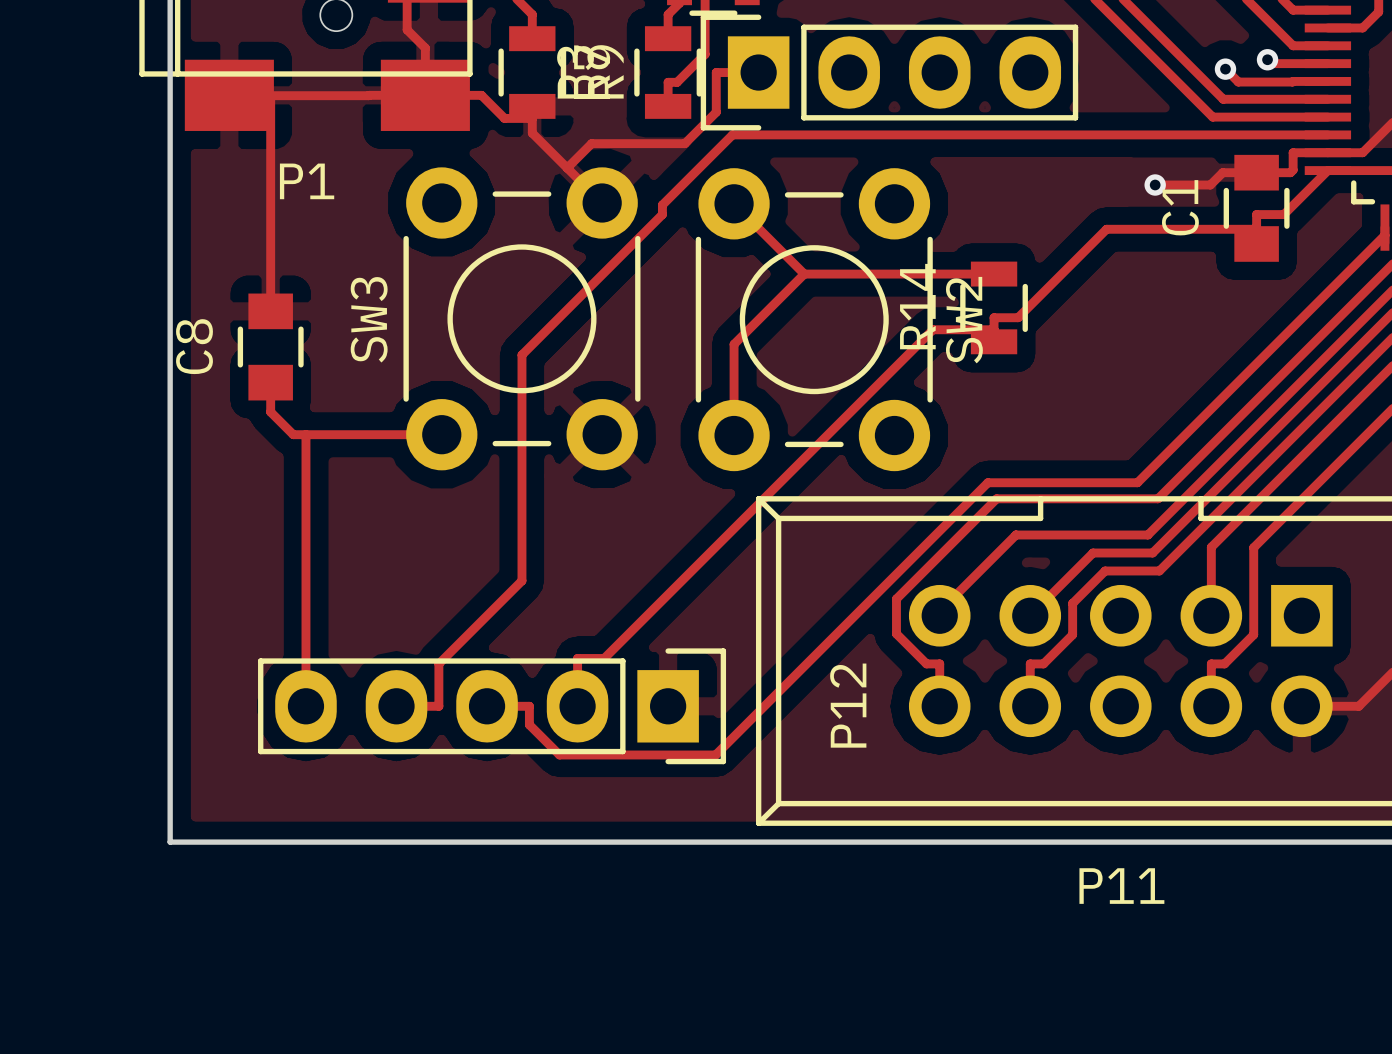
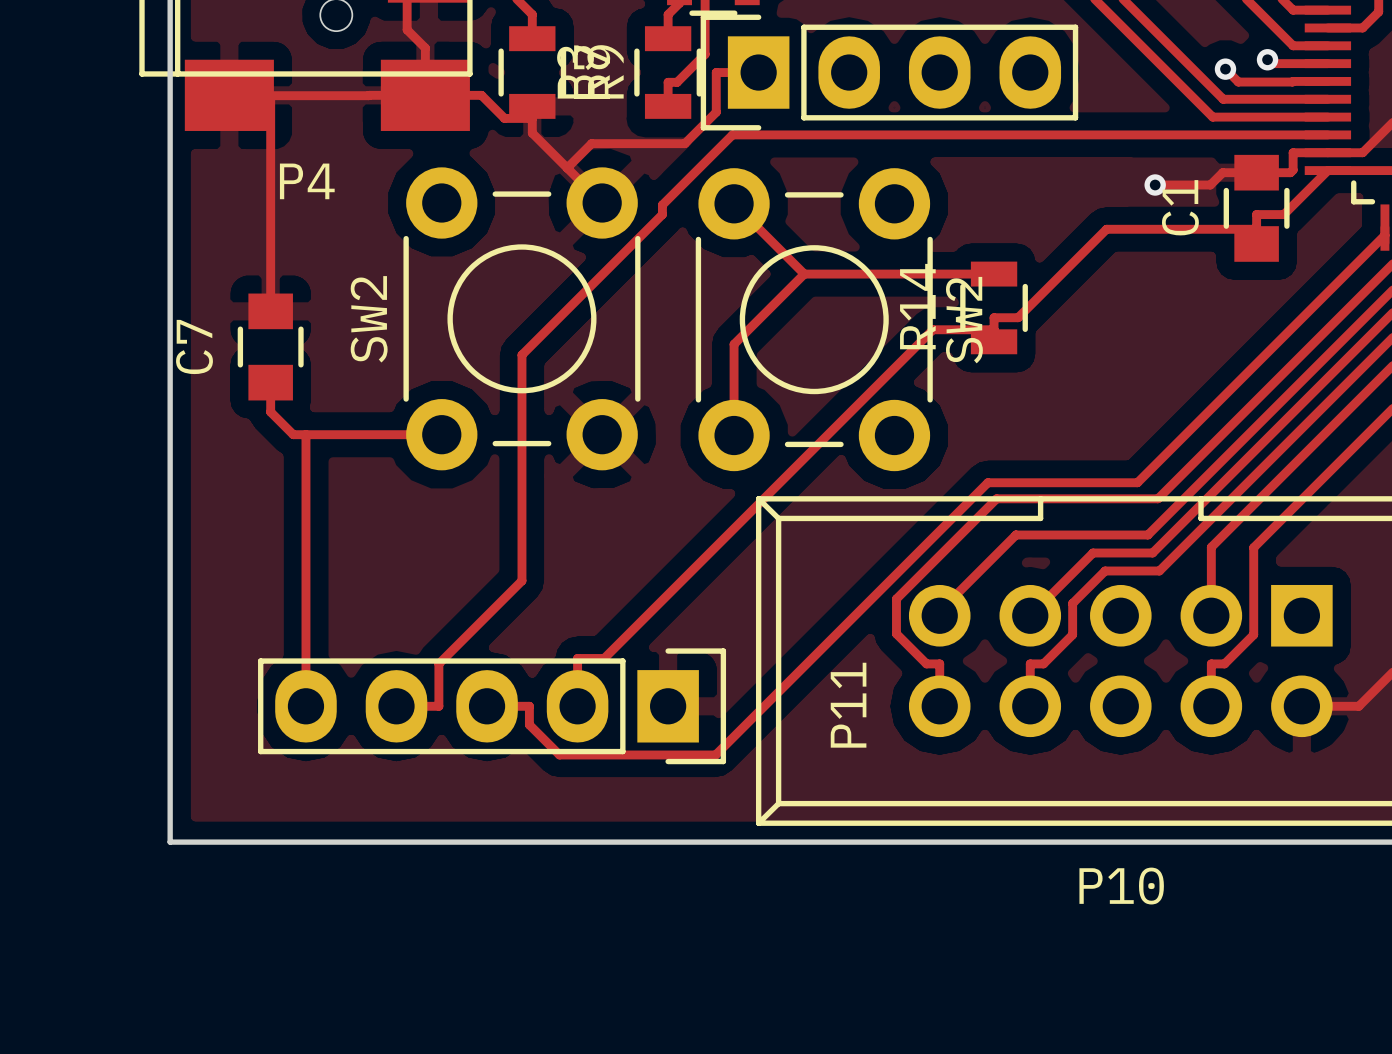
P1 name: P1 (307, 181) -> P4 (307, 181)
SW3 name: SW3 (369, 319) -> SW2 (369, 319)
C8 name: C8 (194, 346) -> C7 (194, 346)
P12 name: P12 (848, 705) -> P11 (848, 705)
P11 name: P11 (1121, 886) -> P10 (1121, 886)

